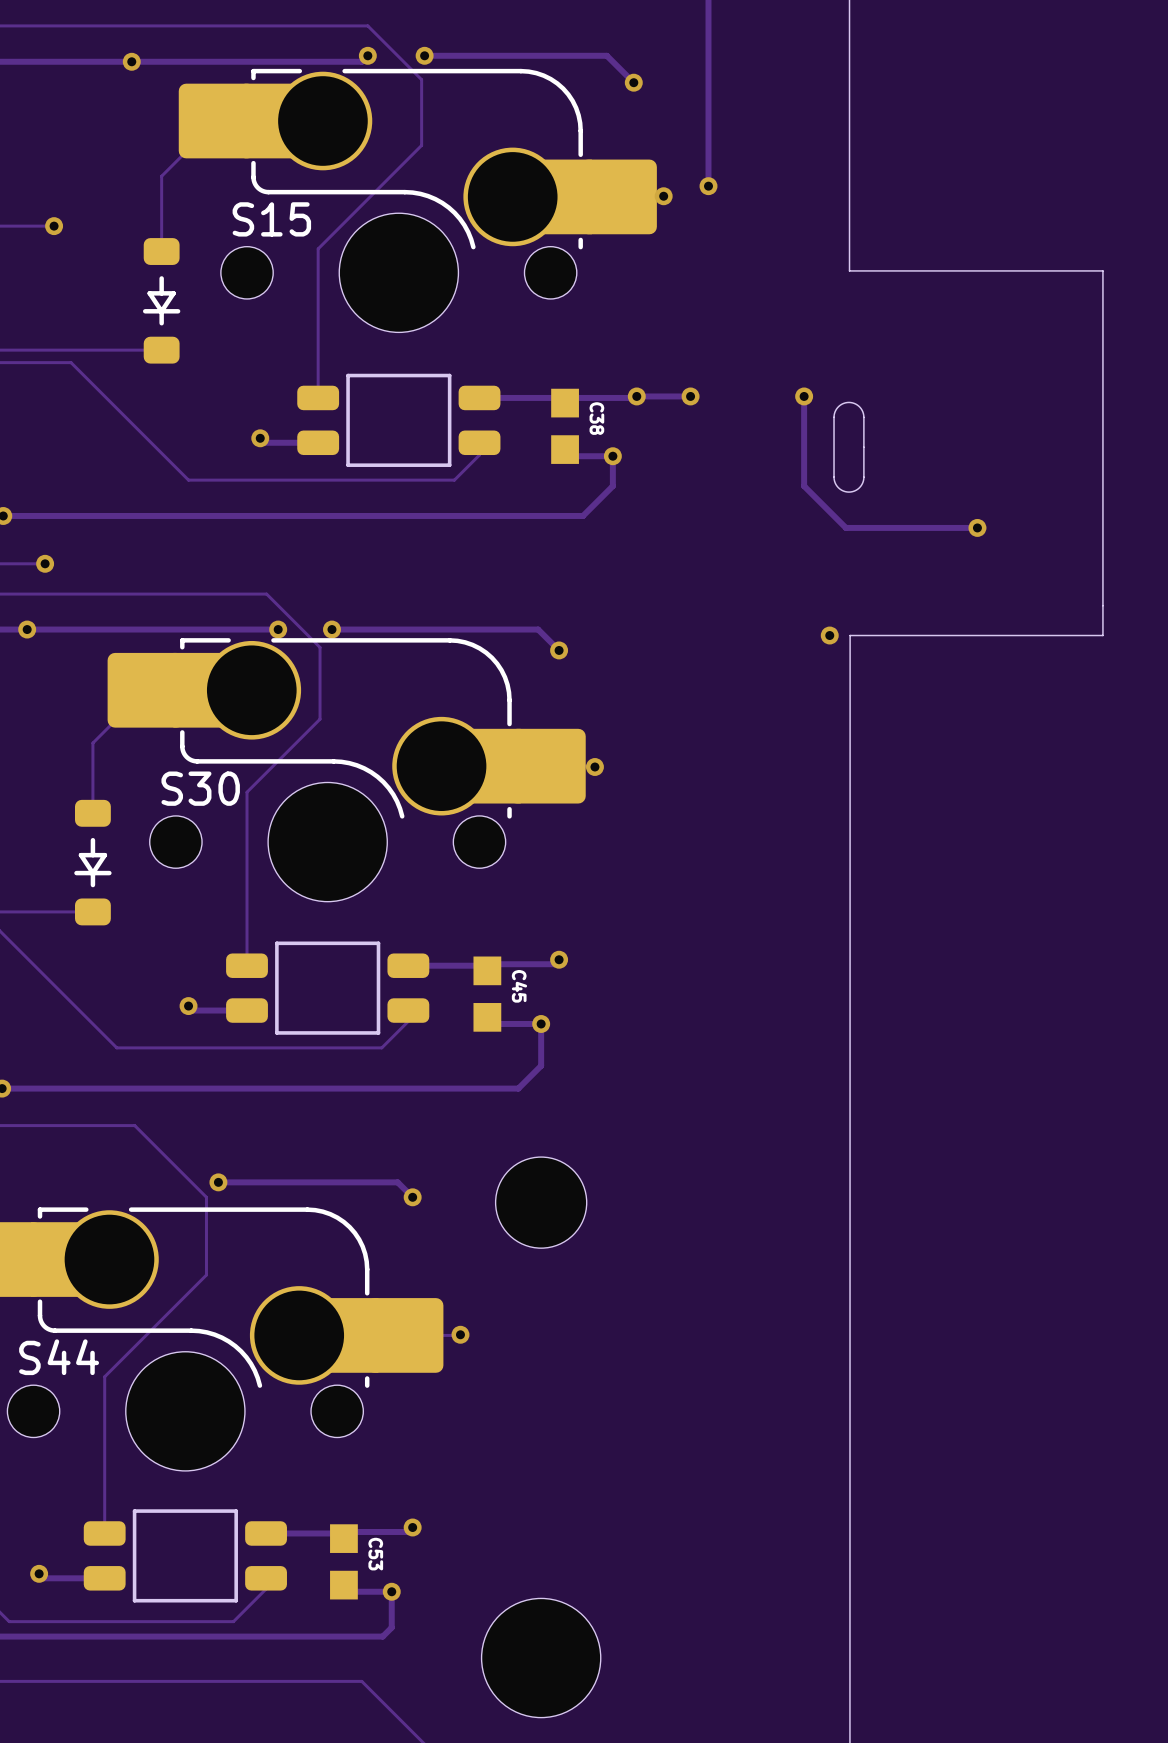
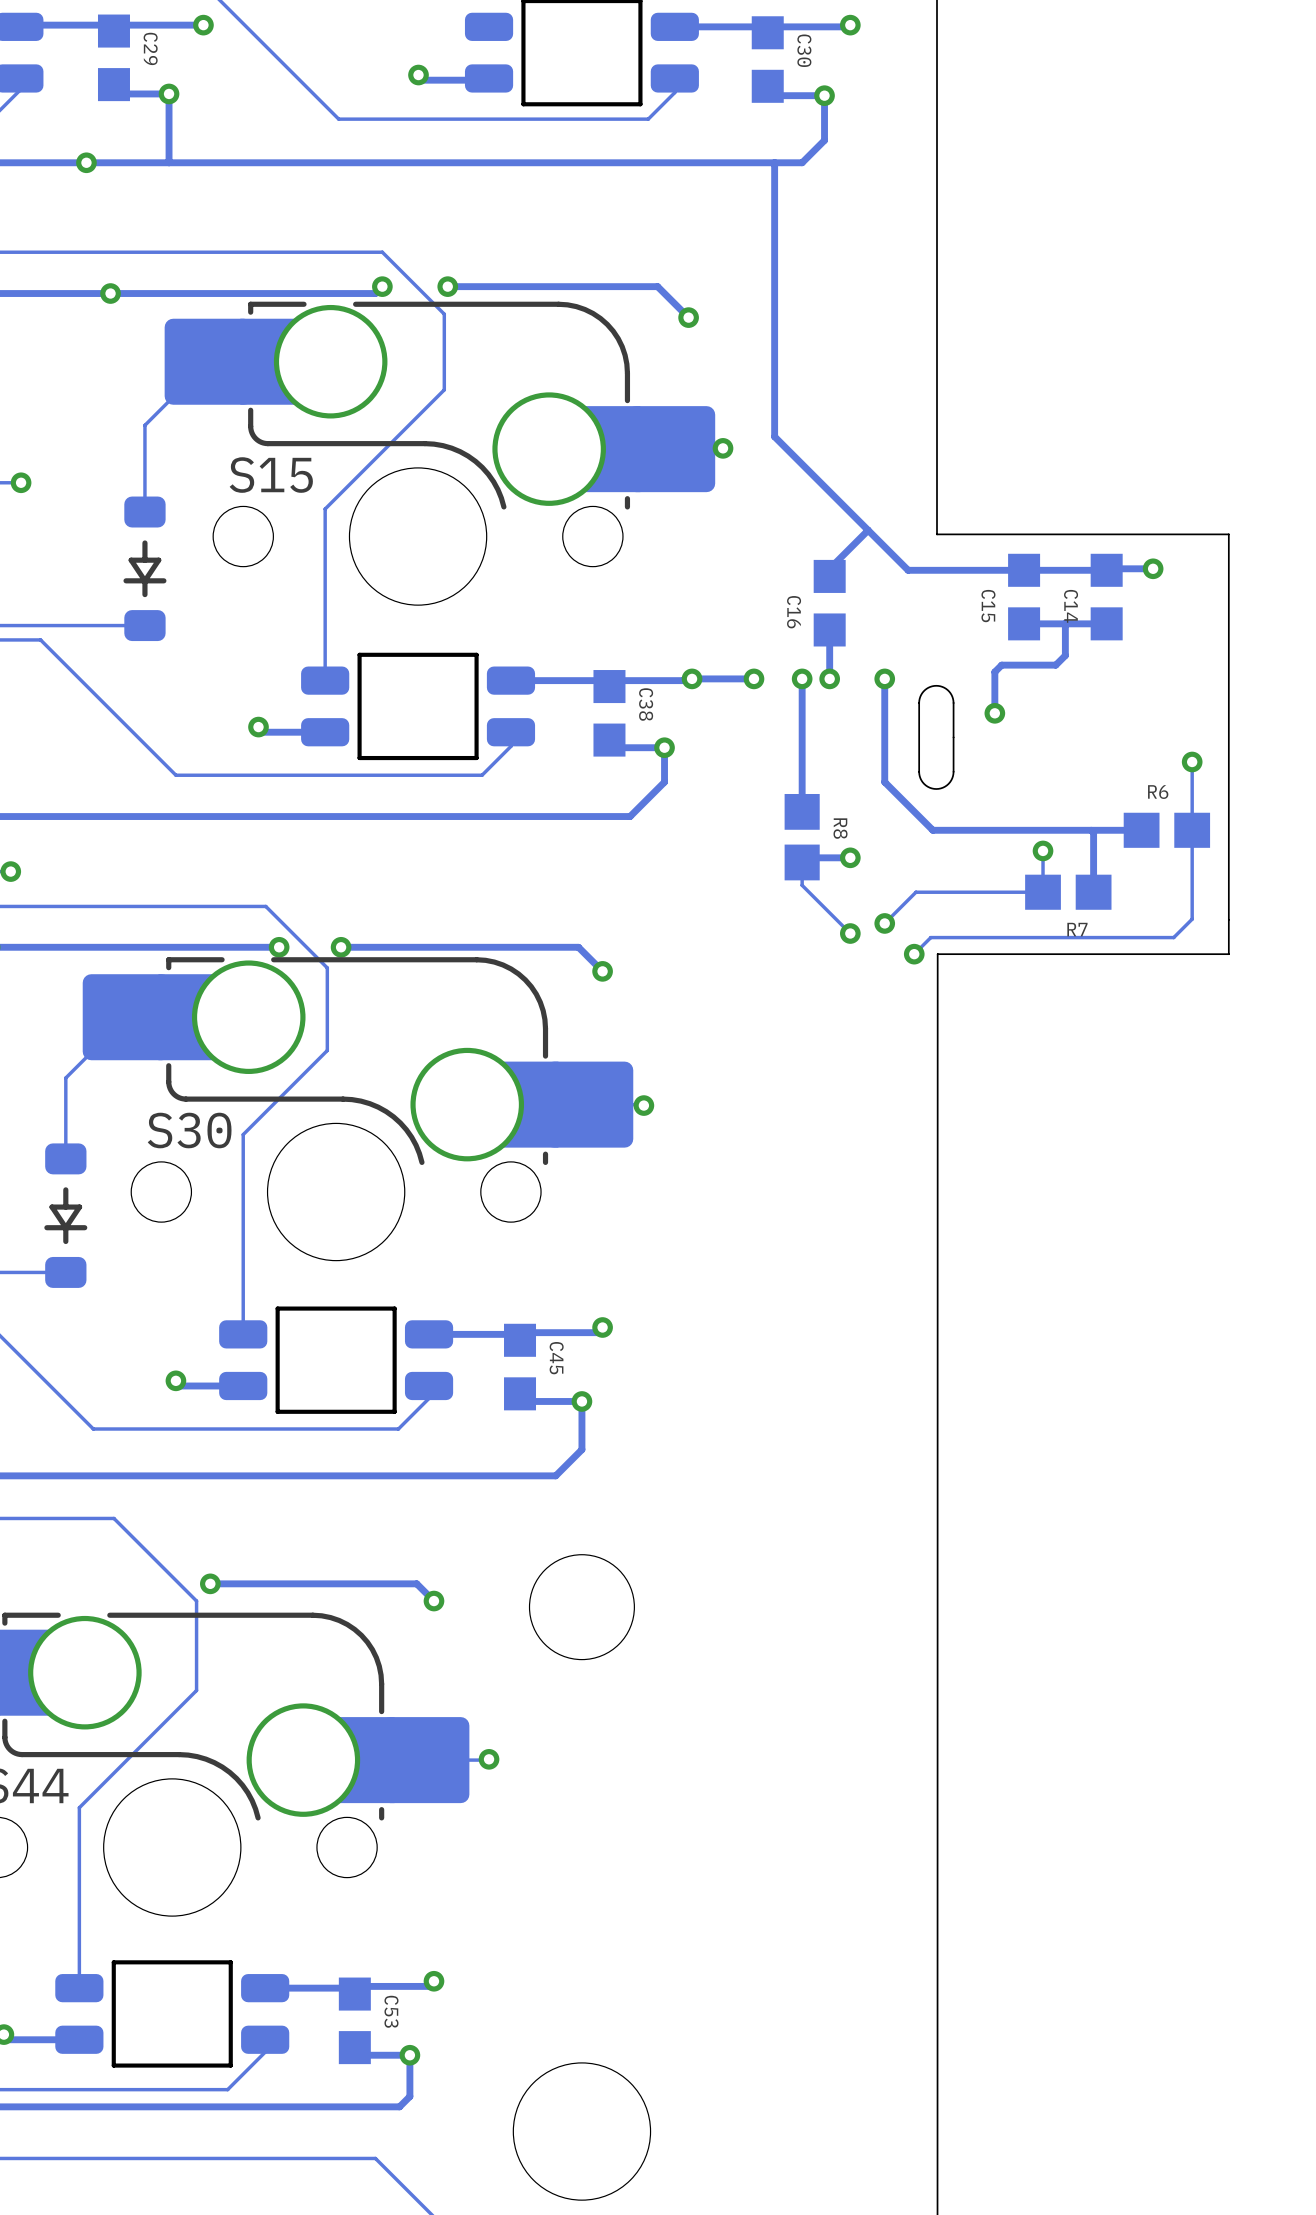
track: none -> (774, 436) (908, 570) (1153, 568)
via: (708, 186) -> none
track: none -> (868, 530) (829, 568) (829, 576)
via: none -> (1153, 568)
C15: none -> (1024, 597)
C14: none -> (1106, 597)
C16: none -> (829, 603)
track: none -> (1024, 623) (1065, 624)
track: none -> (1106, 623) (1065, 624)
track: none -> (1065, 624) (1065, 655) (1055, 665) (1001, 665) (994, 672) (994, 713)
track: none -> (829, 629) (829, 678)
track: none -> (802, 678) (802, 811)
via: none -> (802, 678)
via: none -> (829, 678)
via: none -> (994, 713)
track: none -> (1192, 761) (1192, 919) (1173, 937) (930, 937) (919, 949)
via: none -> (1192, 761)
via position: (977, 527) -> (1043, 850)
track: none -> (1141, 830) (1091, 830) (1093, 832) (1093, 892)
R6: none -> (1166, 830)
R8: none -> (802, 837)
track: none -> (1043, 850) (1043, 892) (915, 892) (884, 923)
track: none -> (850, 857) (806, 857) (802, 862) (802, 885) (850, 933)
via: none -> (850, 857)
R7: none -> (1068, 892)
via: none -> (884, 923)
via: none -> (850, 933)

